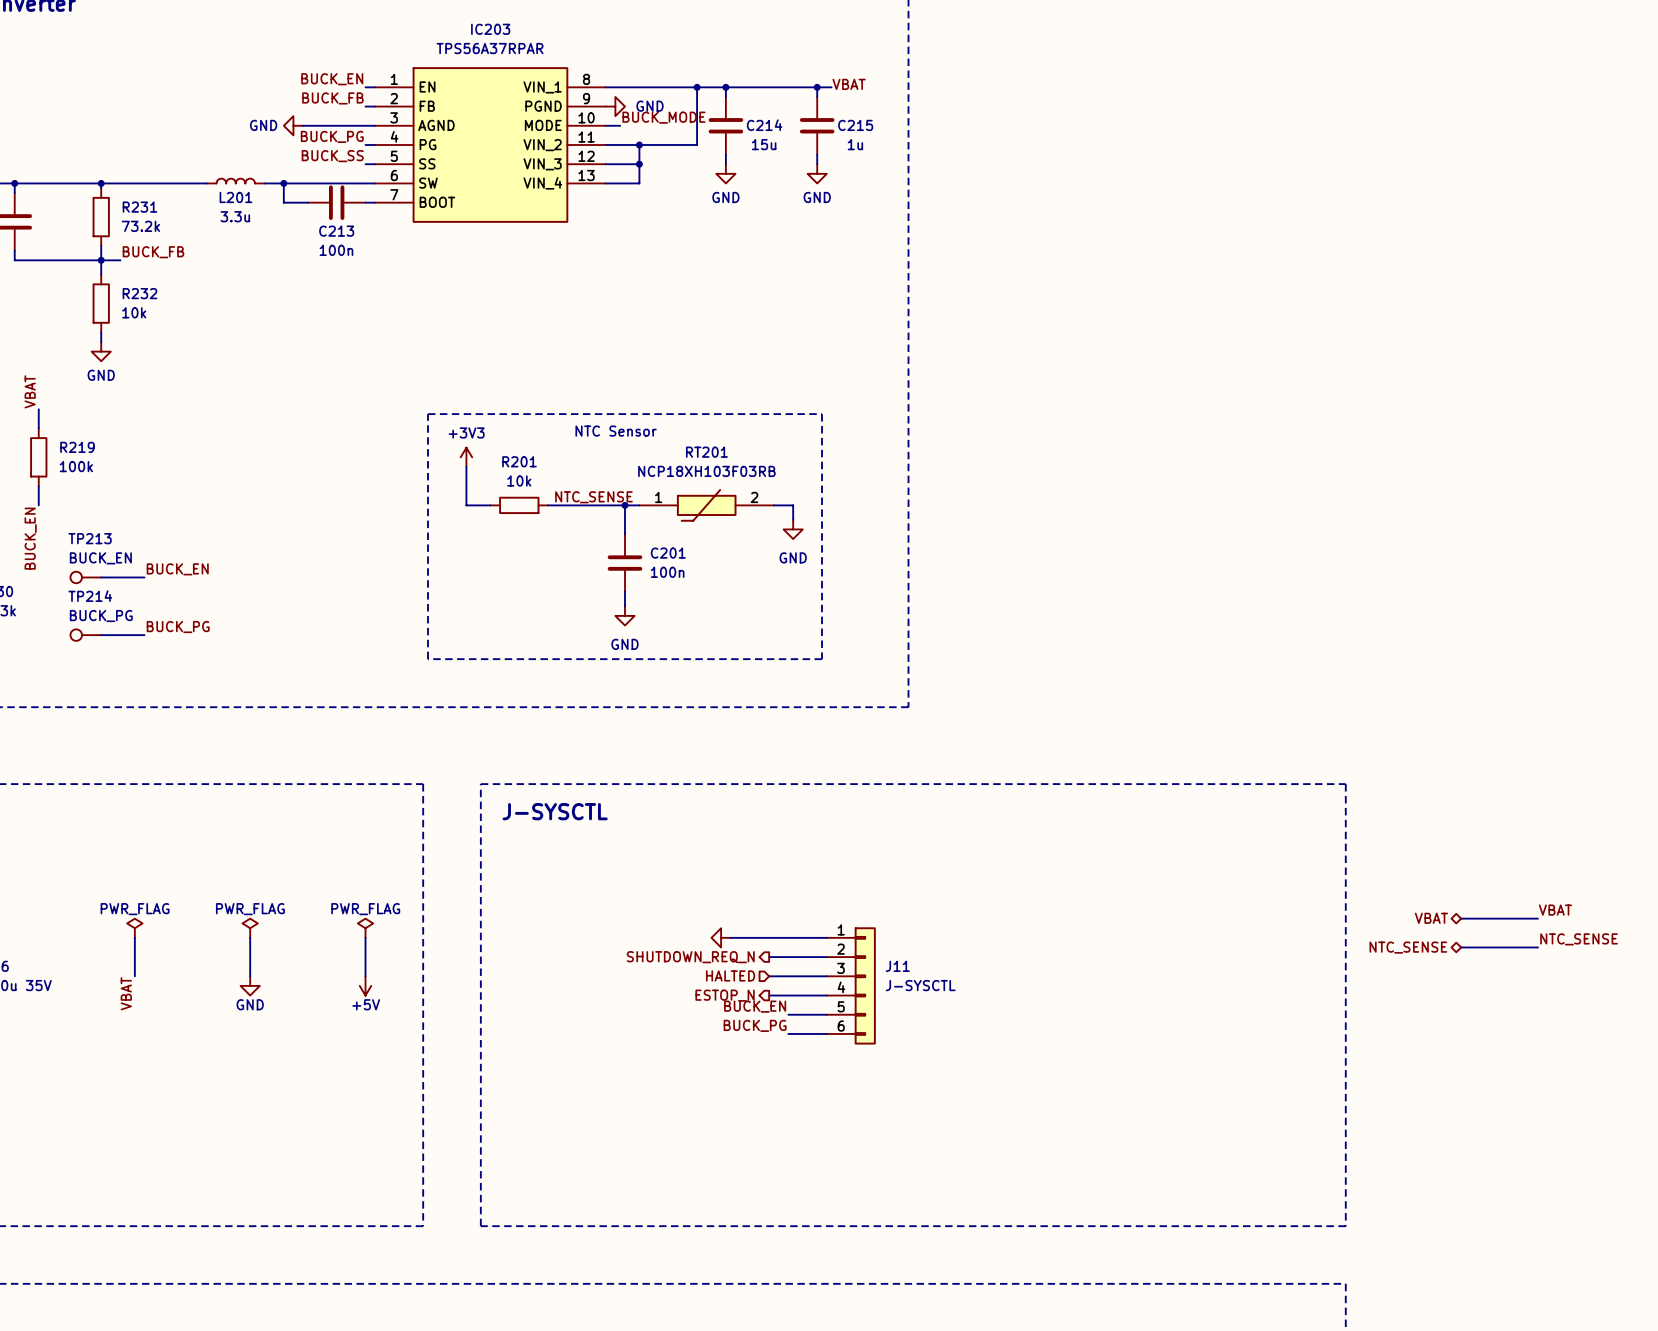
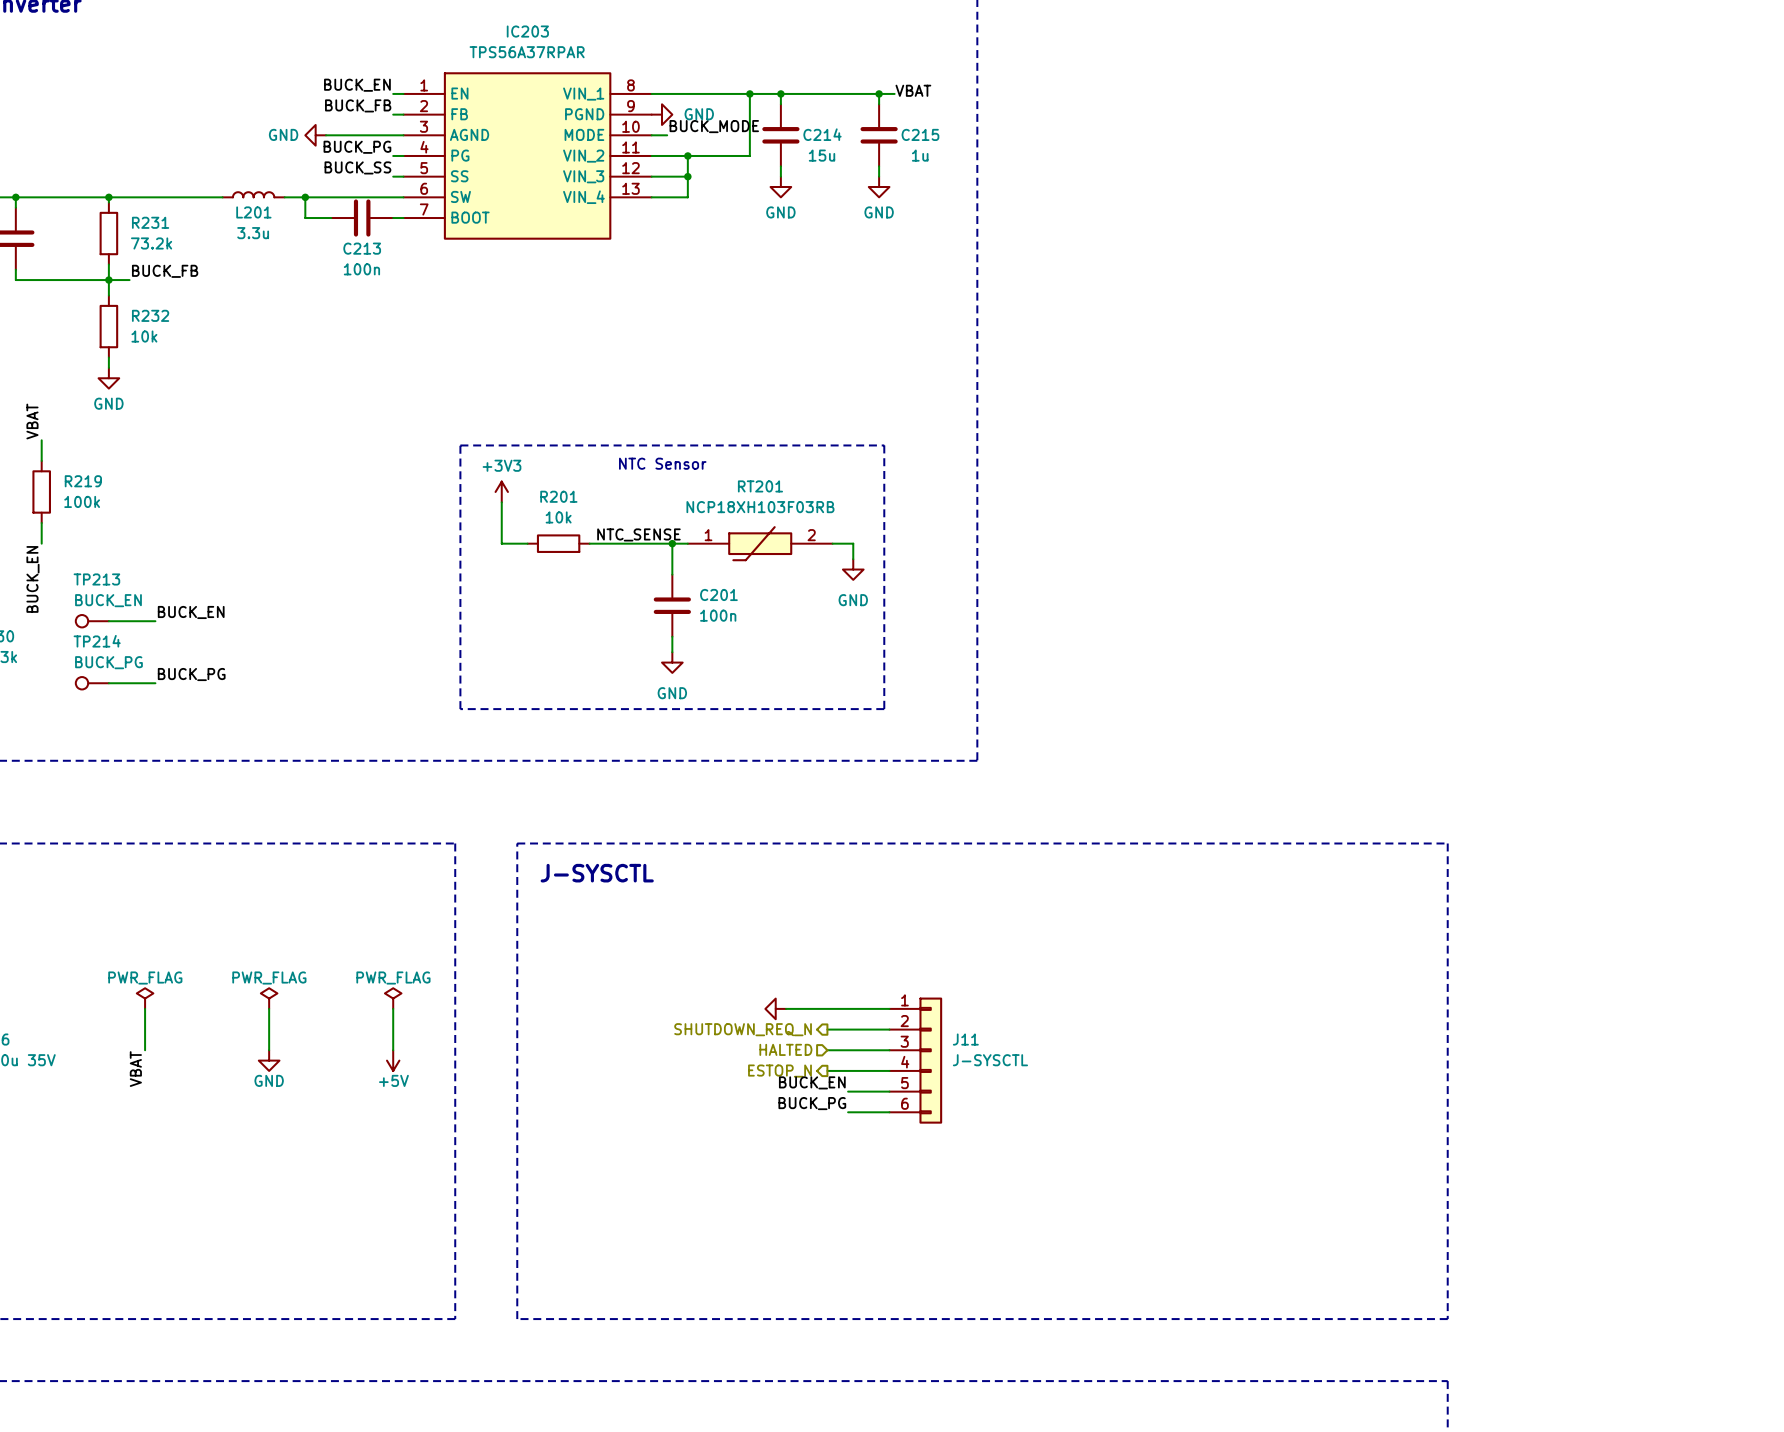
label: VBAT (1555, 910) -> none
hierarchical label: VBAT (1431, 918) -> none
wire: (1461, 918) (1537, 918) -> none
label: NTC_SENSE (1579, 939) -> none
hierarchical label: NTC_SENSE (1408, 947) -> none
wire: (1461, 947) (1537, 947) -> none

